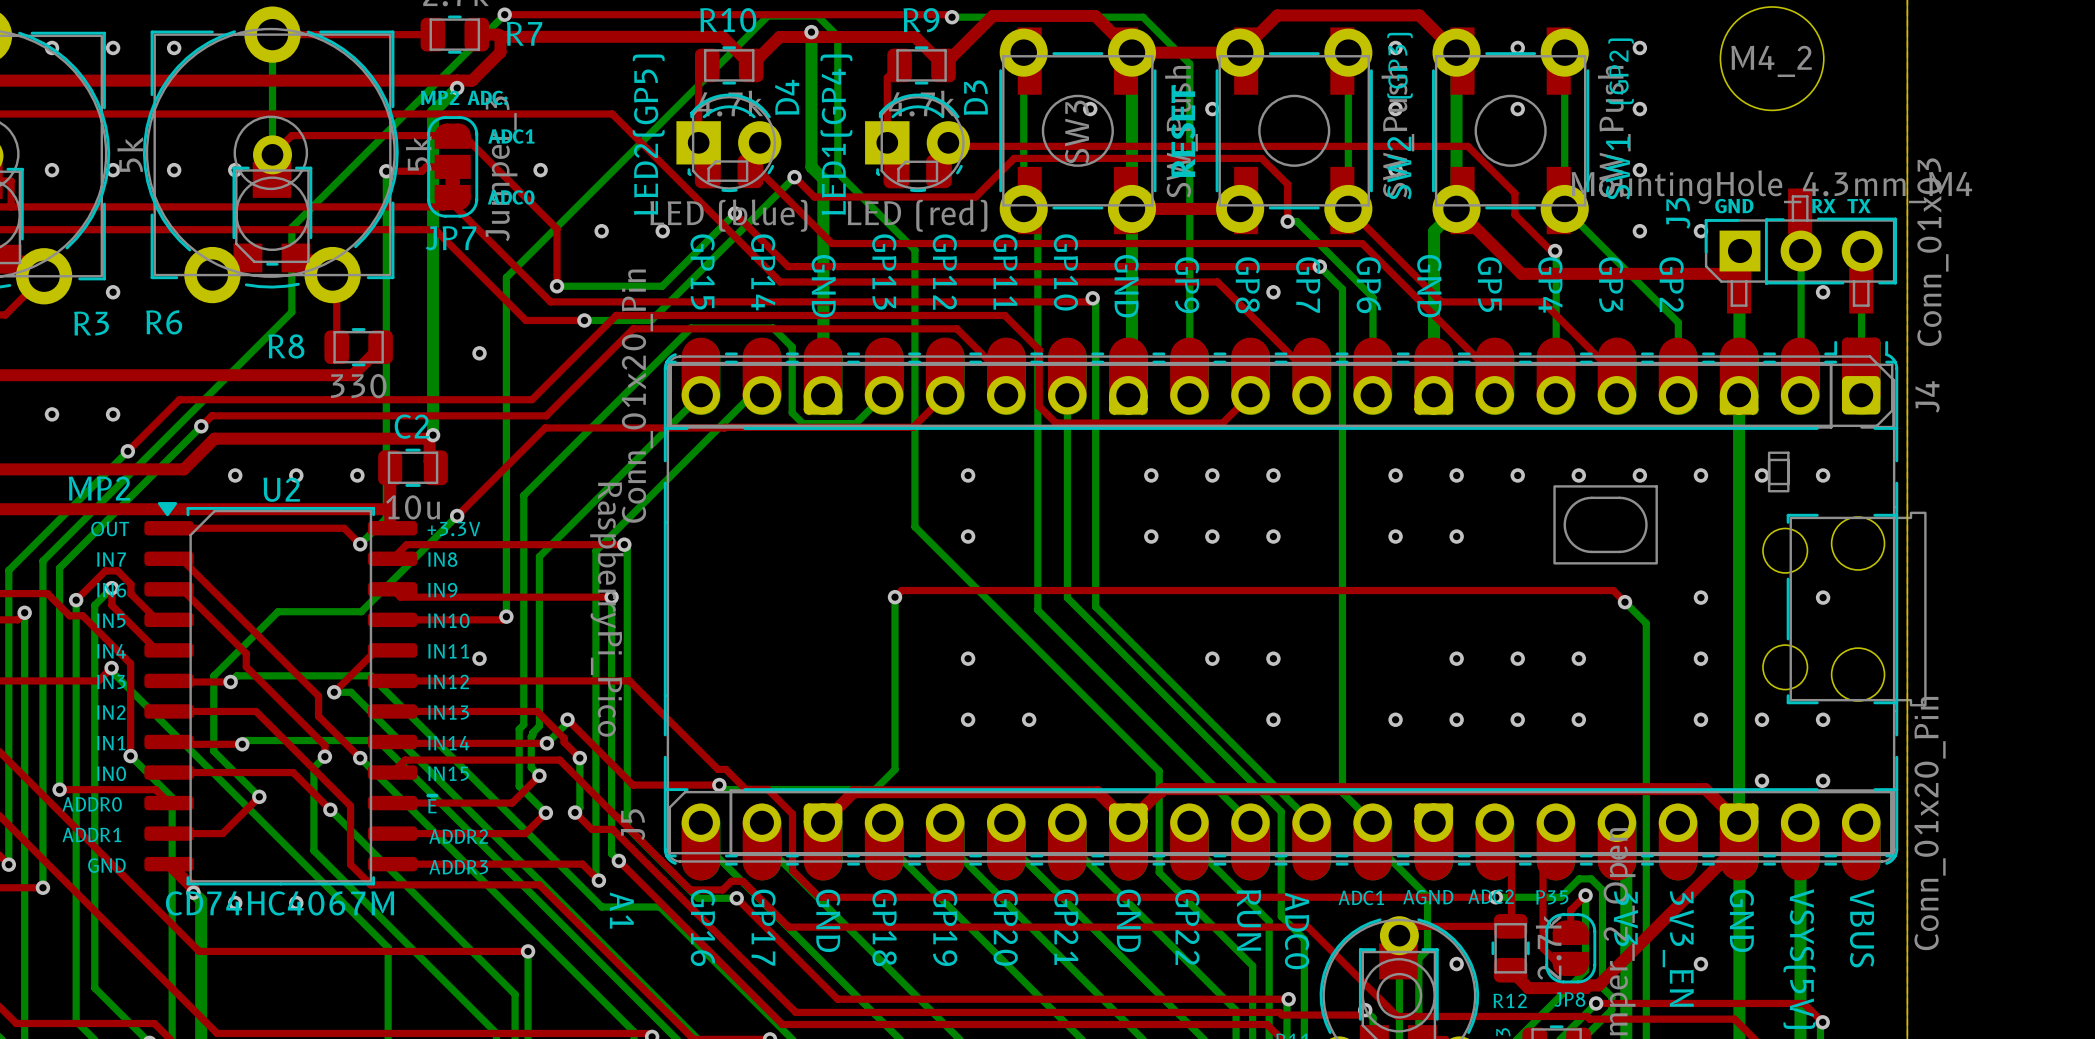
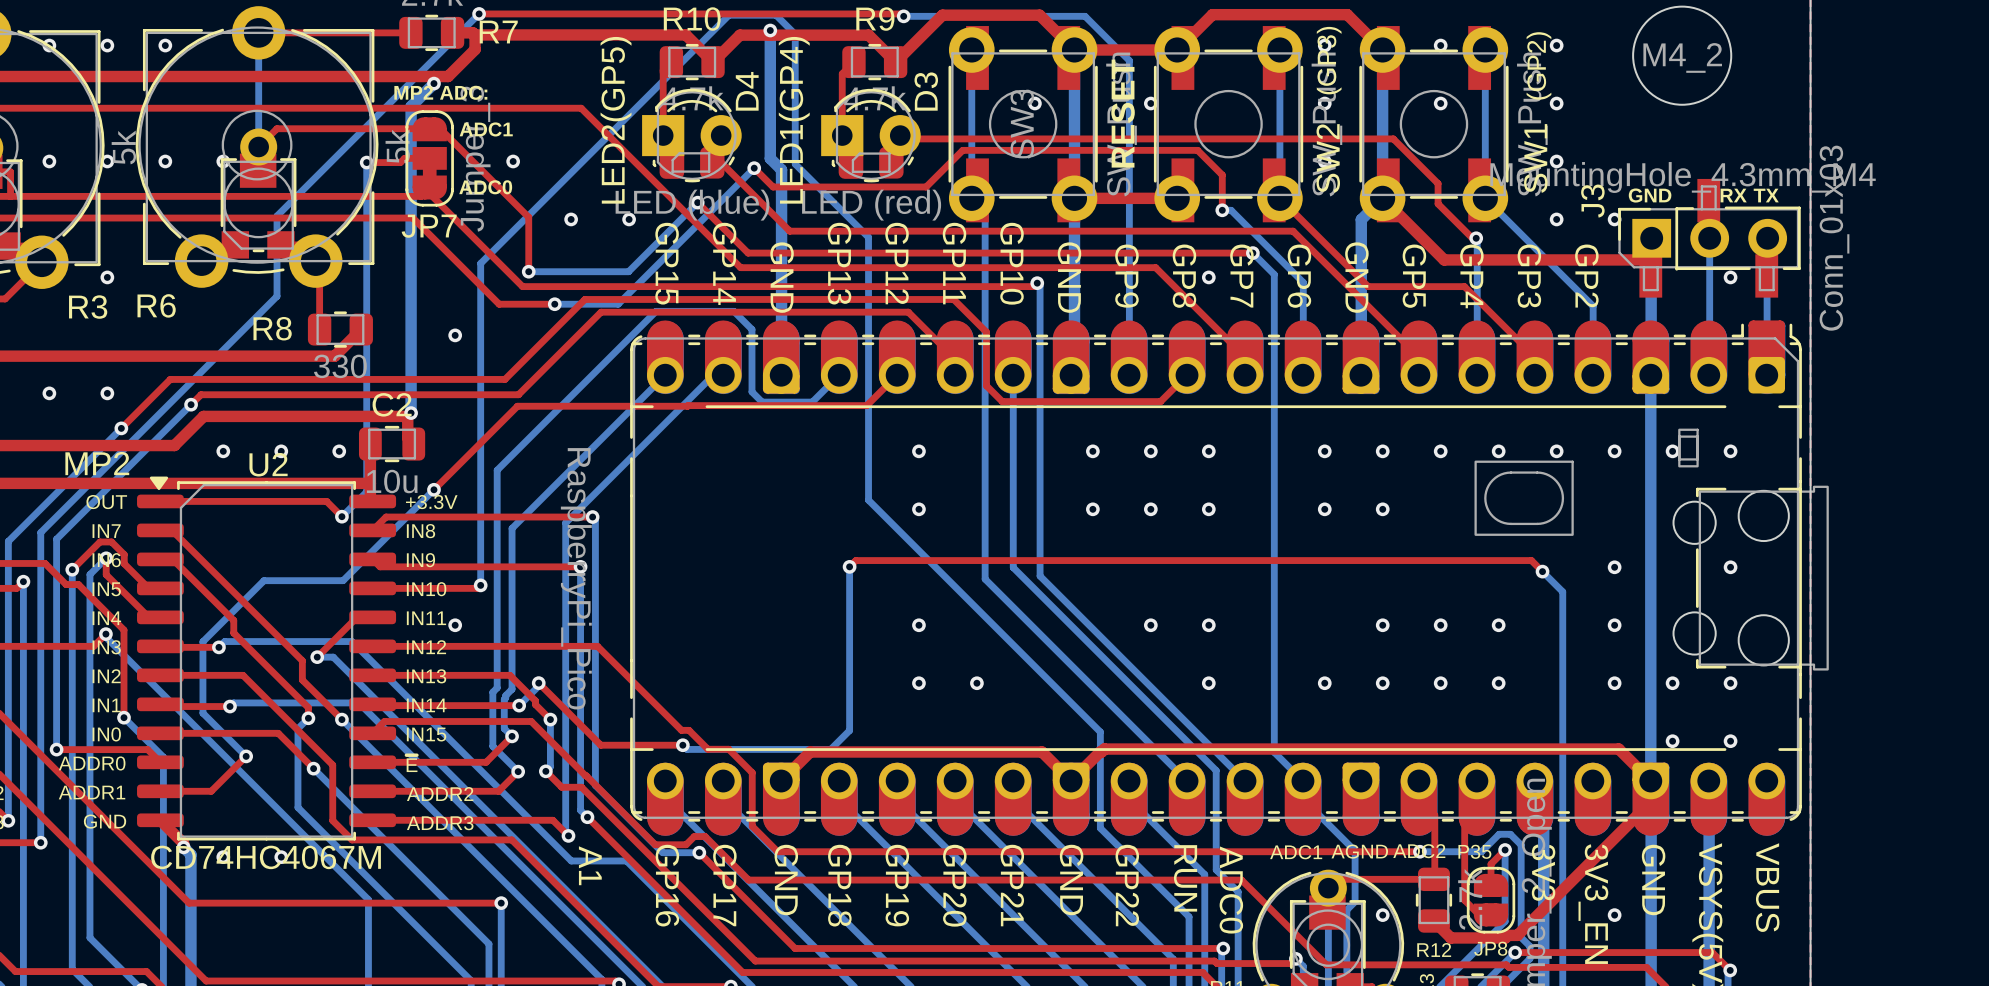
J4: Conn_01x20_Pin (1281, 395) -> none
J5: Conn_01x20_Pin (1281, 822) -> none

